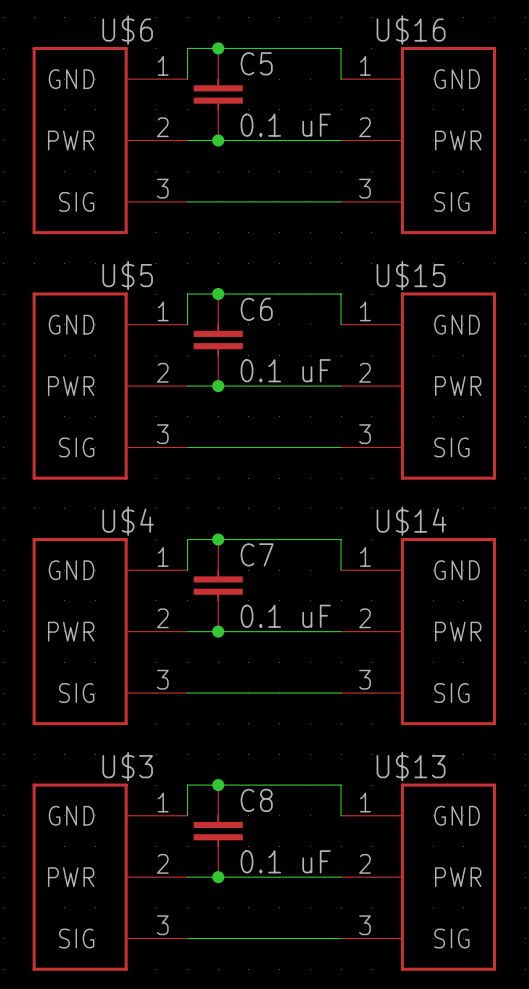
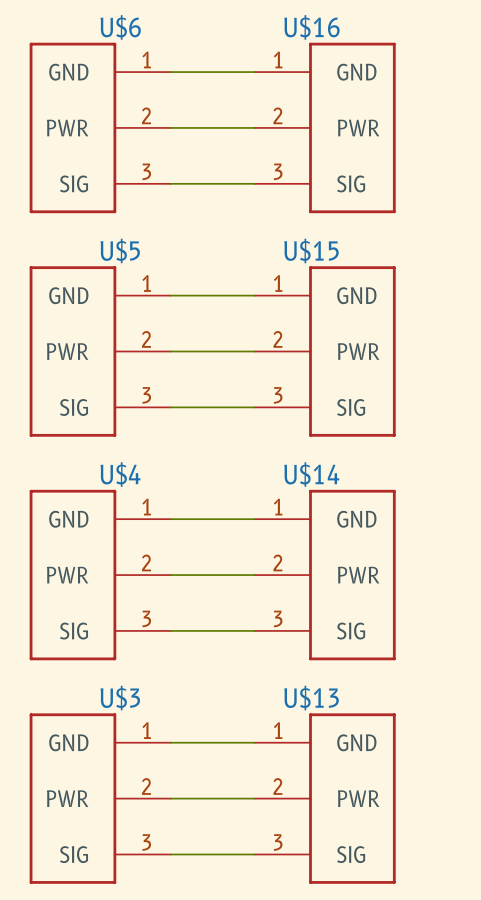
junction: (218, 48) -> none
wire: (187, 79) (187, 48) (341, 48) (341, 79) -> (170, 72) (254, 72)
C5: 0.1 uF (218, 94) -> none
junction: (218, 140) -> none
U$16 position: (418, 140) -> (325, 127)
junction: (218, 294) -> none
wire: (187, 324) (187, 294) (341, 294) (341, 324) -> (170, 295) (254, 295)
C6: 0.1 uF (218, 340) -> none
junction: (218, 386) -> none
U$15 position: (418, 386) -> (325, 351)
junction: (218, 539) -> none
wire: (187, 570) (187, 539) (341, 539) (341, 570) -> (170, 519) (254, 519)
C7: 0.1 uF (218, 585) -> none
junction: (218, 631) -> none
U$14 position: (418, 631) -> (325, 575)
junction: (218, 785) -> none
wire: (187, 815) (187, 785) (341, 785) (341, 815) -> (170, 742) (254, 742)
C8: 0.1 uF (218, 831) -> none
junction: (218, 877) -> none
U$13 position: (418, 877) -> (325, 798)

